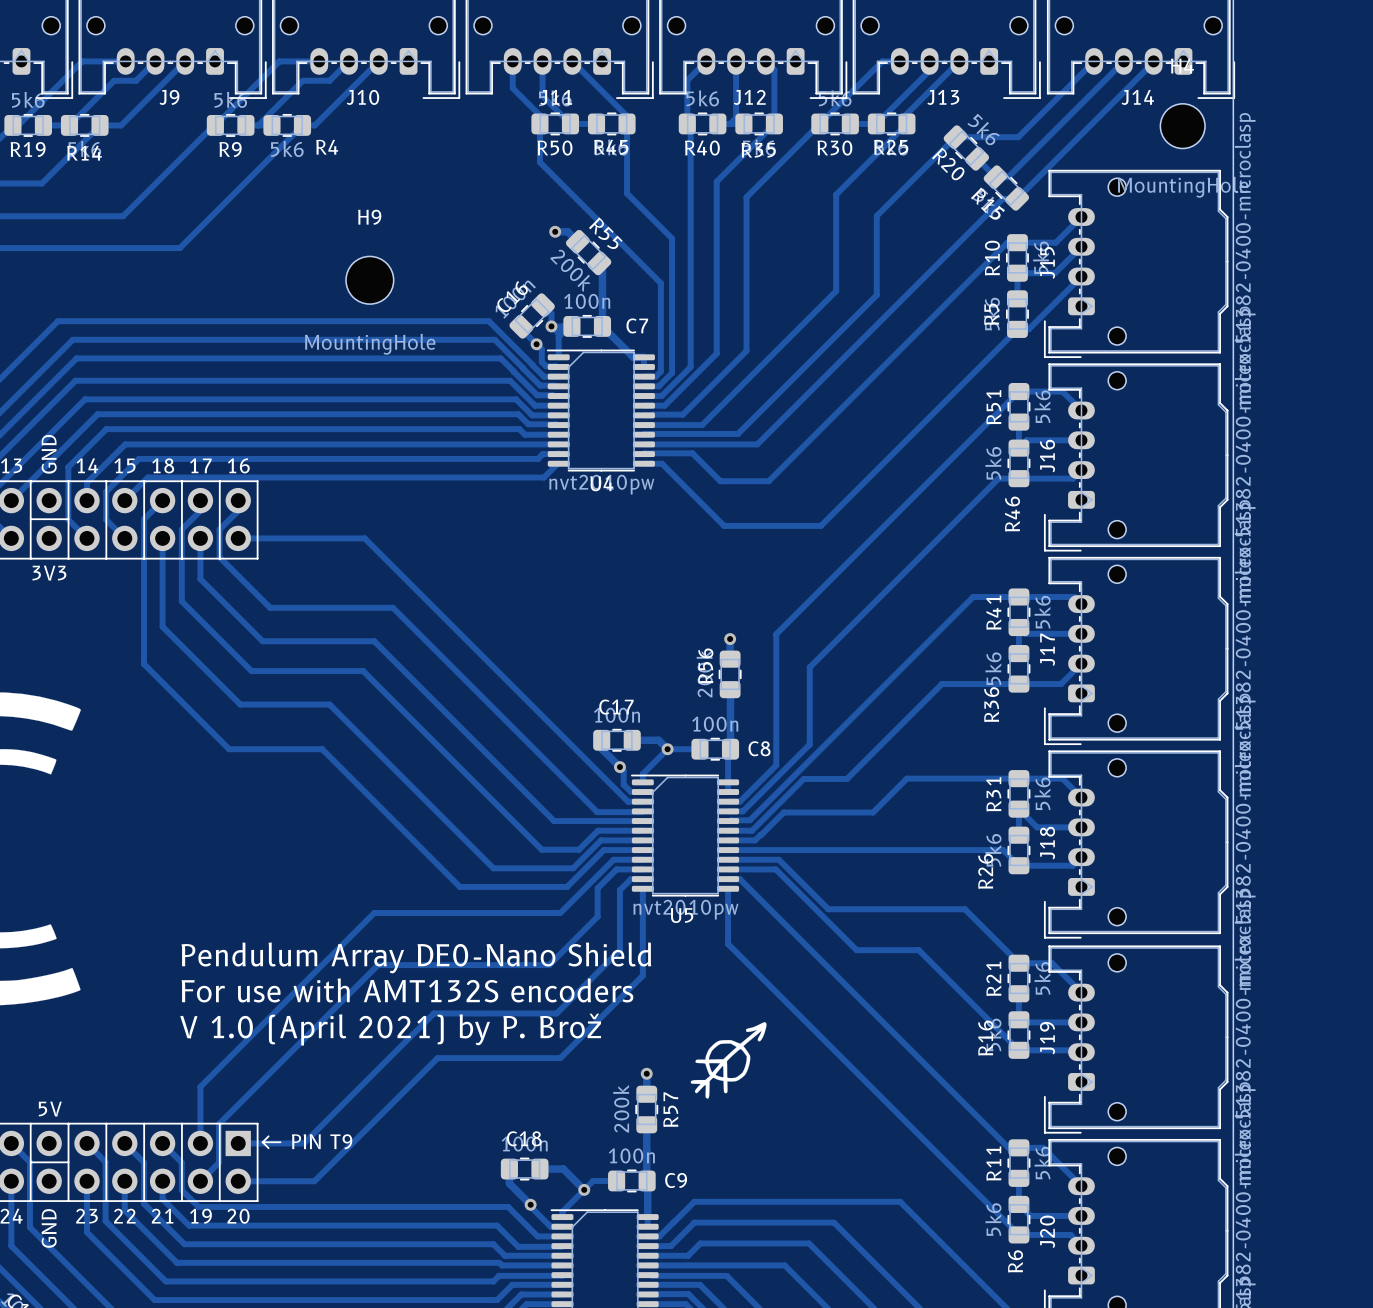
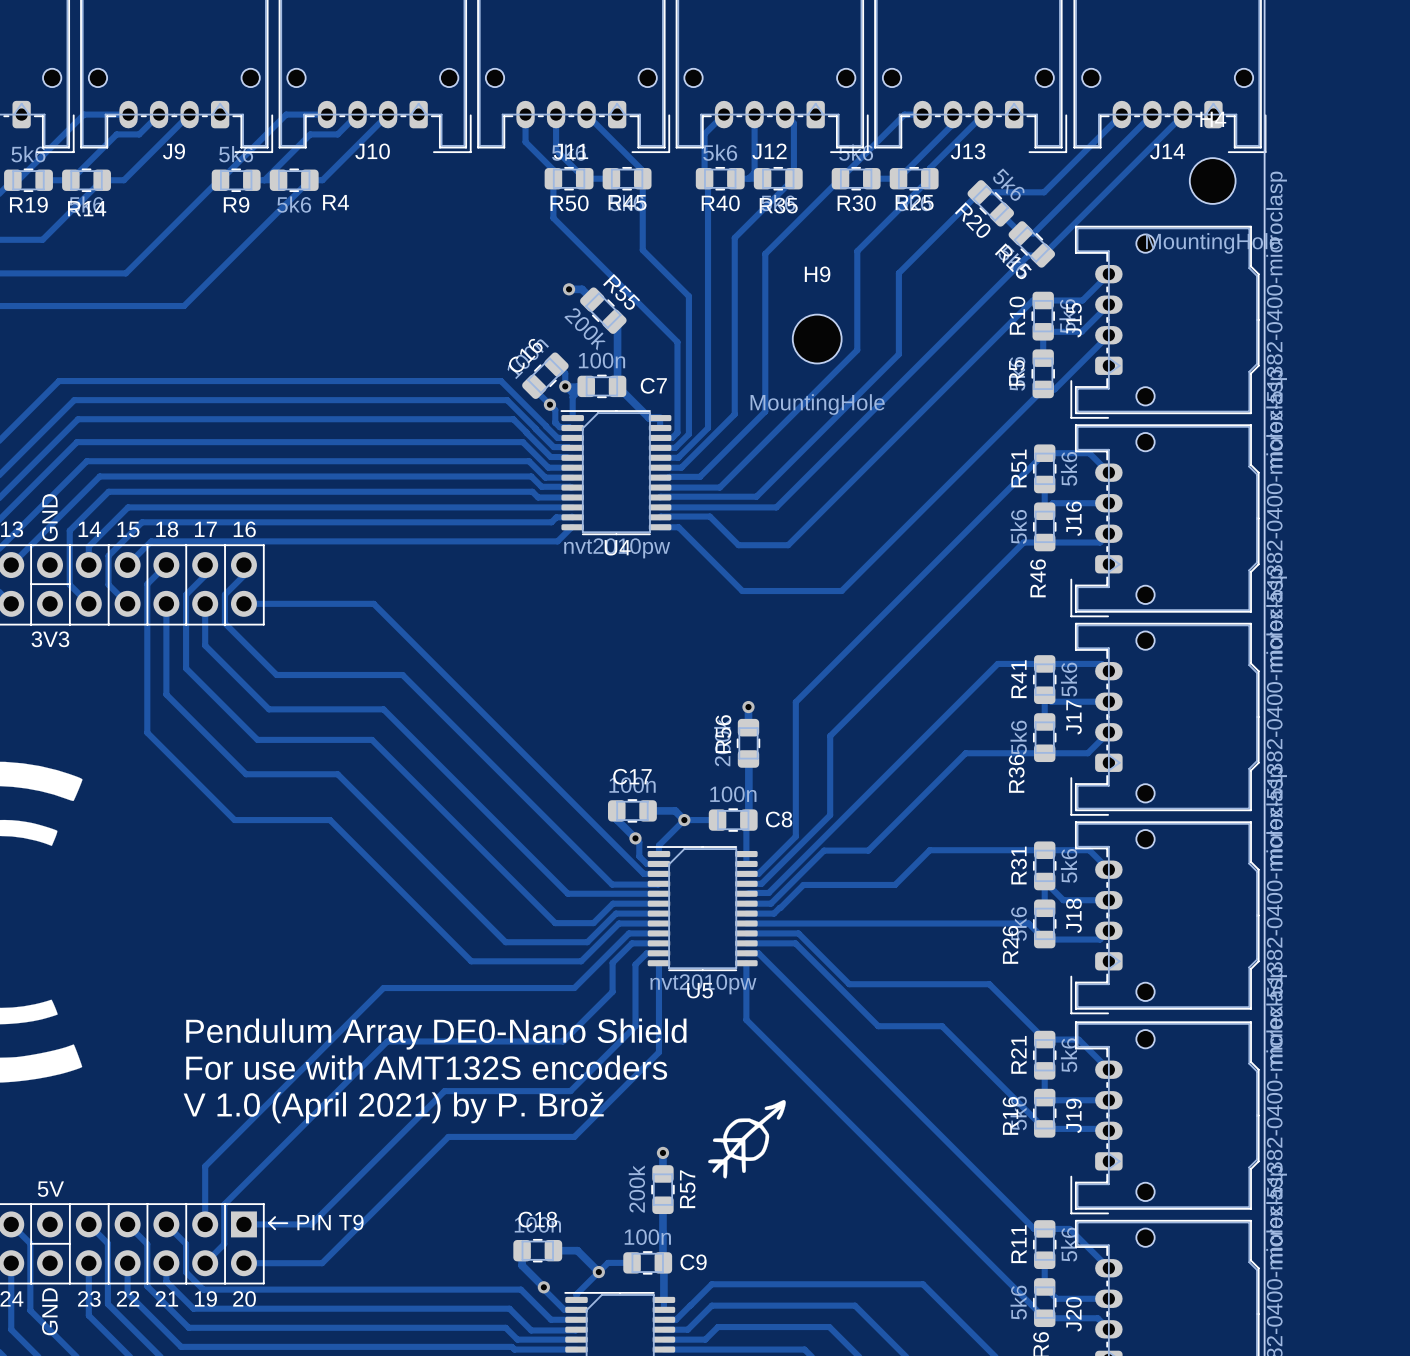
H9 position: (369, 280) -> (817, 339)

